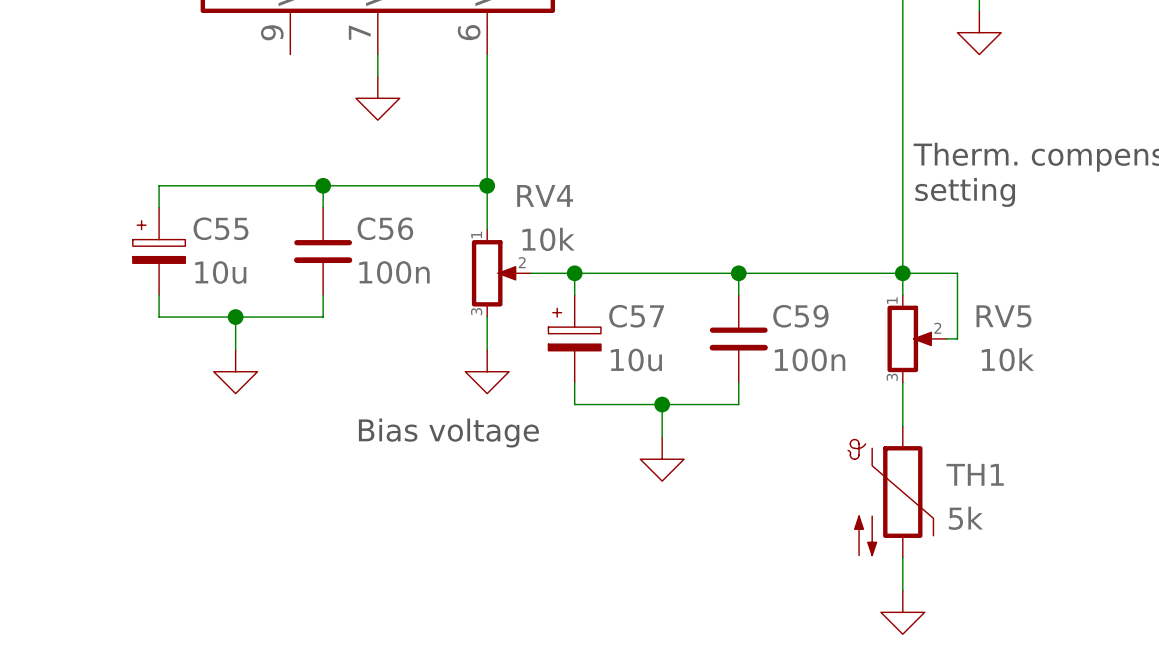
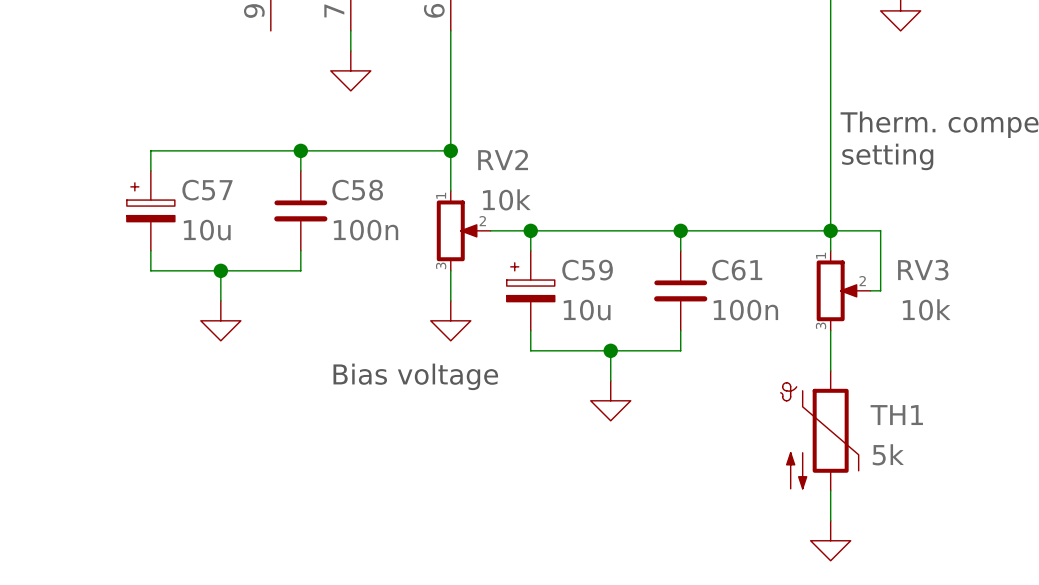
RV4 name: RV4 (545, 195) -> RV2 (503, 159)
C55 name: C55 (220, 228) -> C57 (207, 190)
C56 name: C56 (385, 228) -> C58 (357, 190)
C57 name: C57 (636, 316) -> C59 (587, 270)
C59 name: C59 (800, 316) -> C61 (737, 270)
RV5 name: RV5 (1003, 316) -> RV3 (923, 270)

